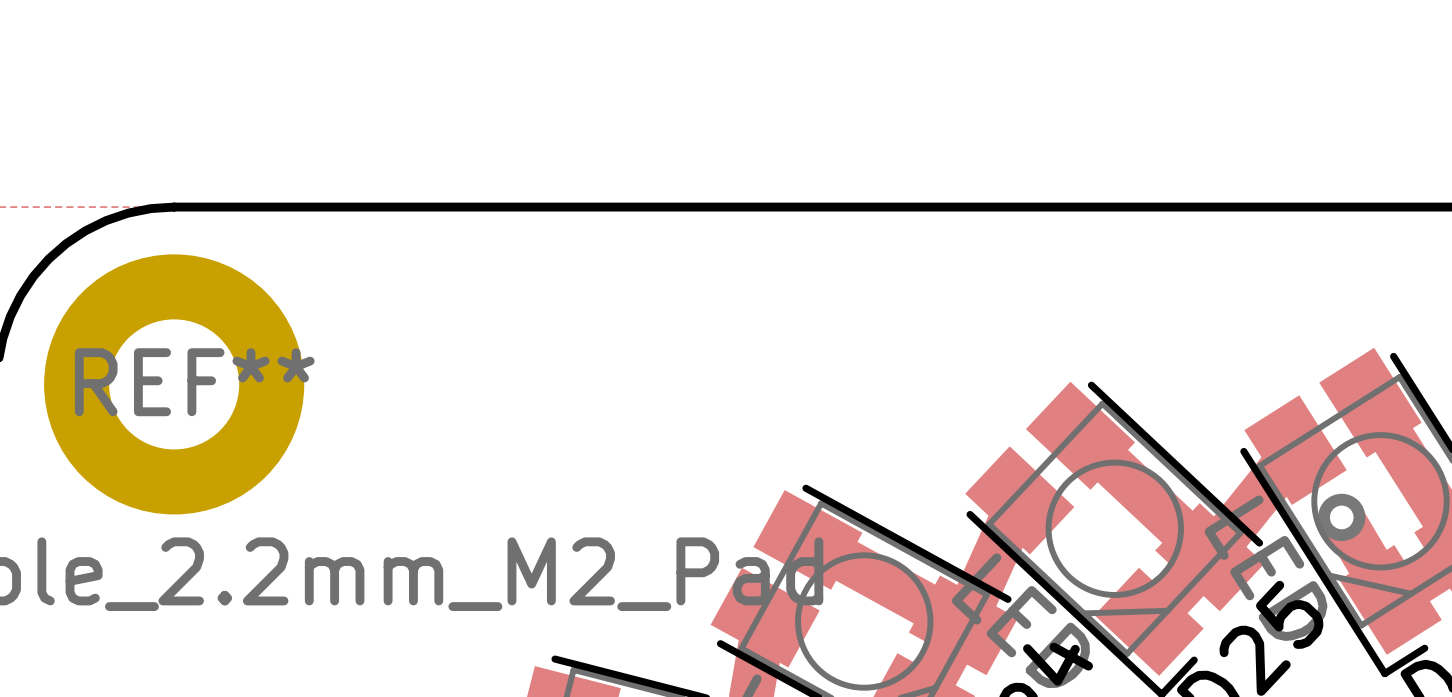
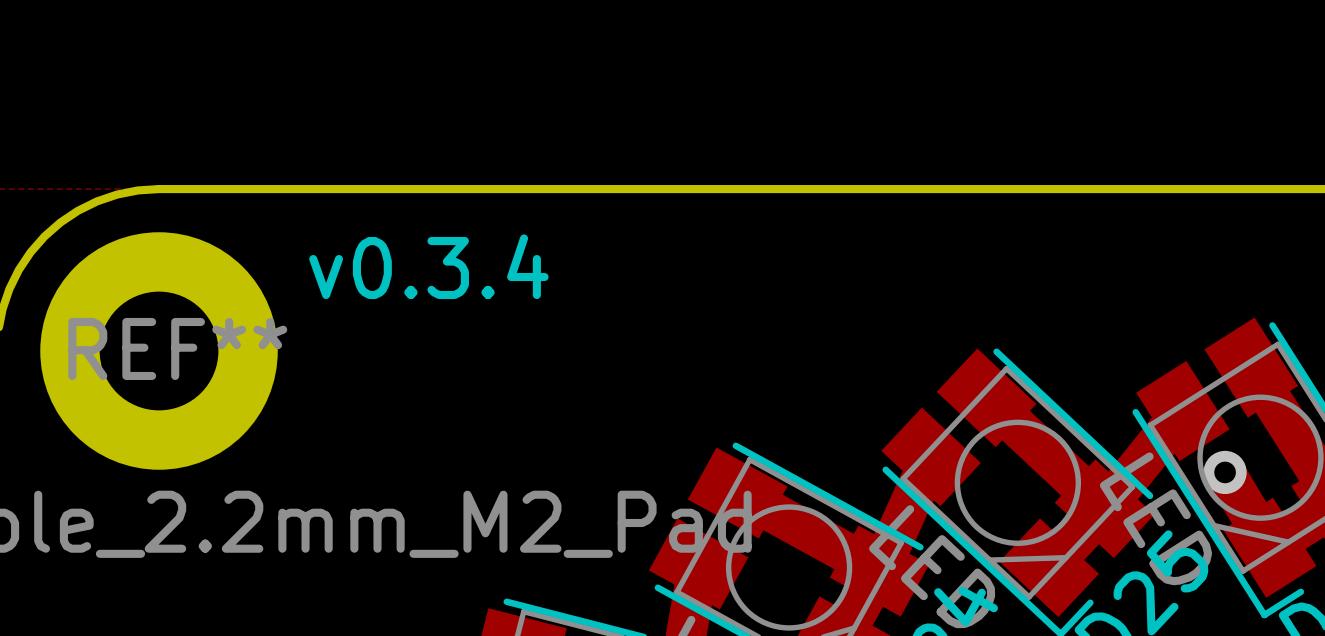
text: none -> v0.3.4 (428, 266)

